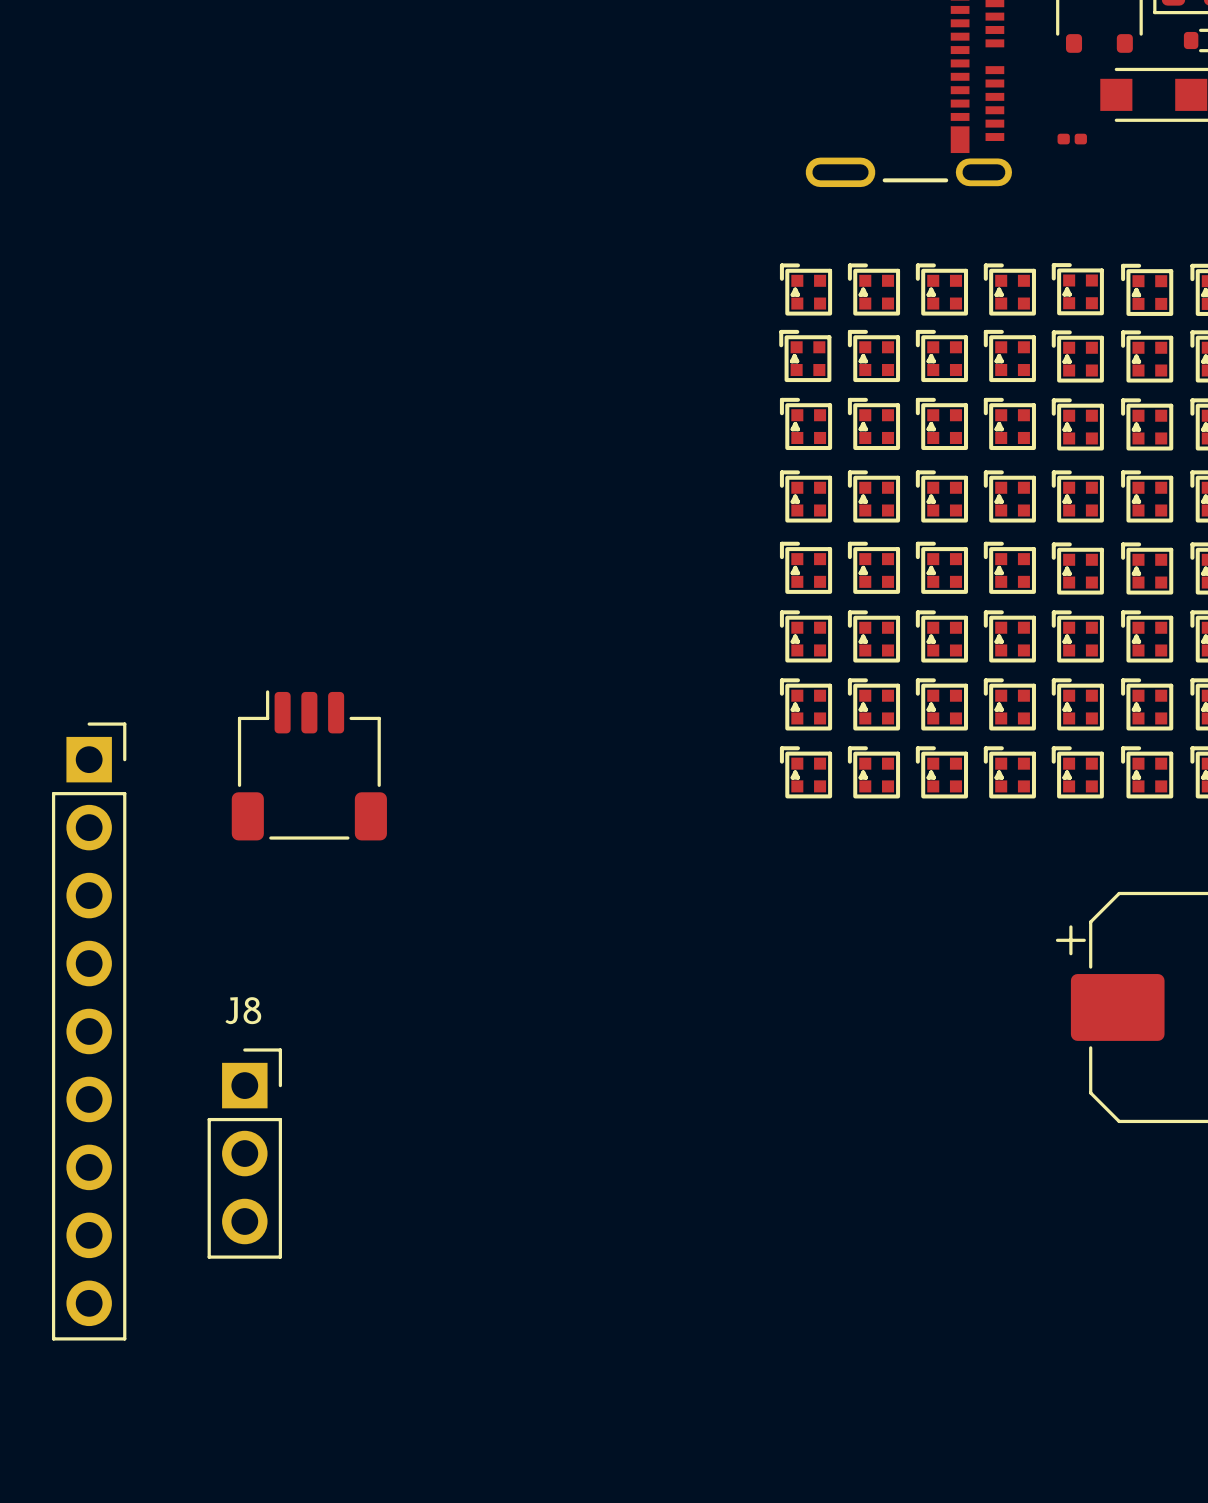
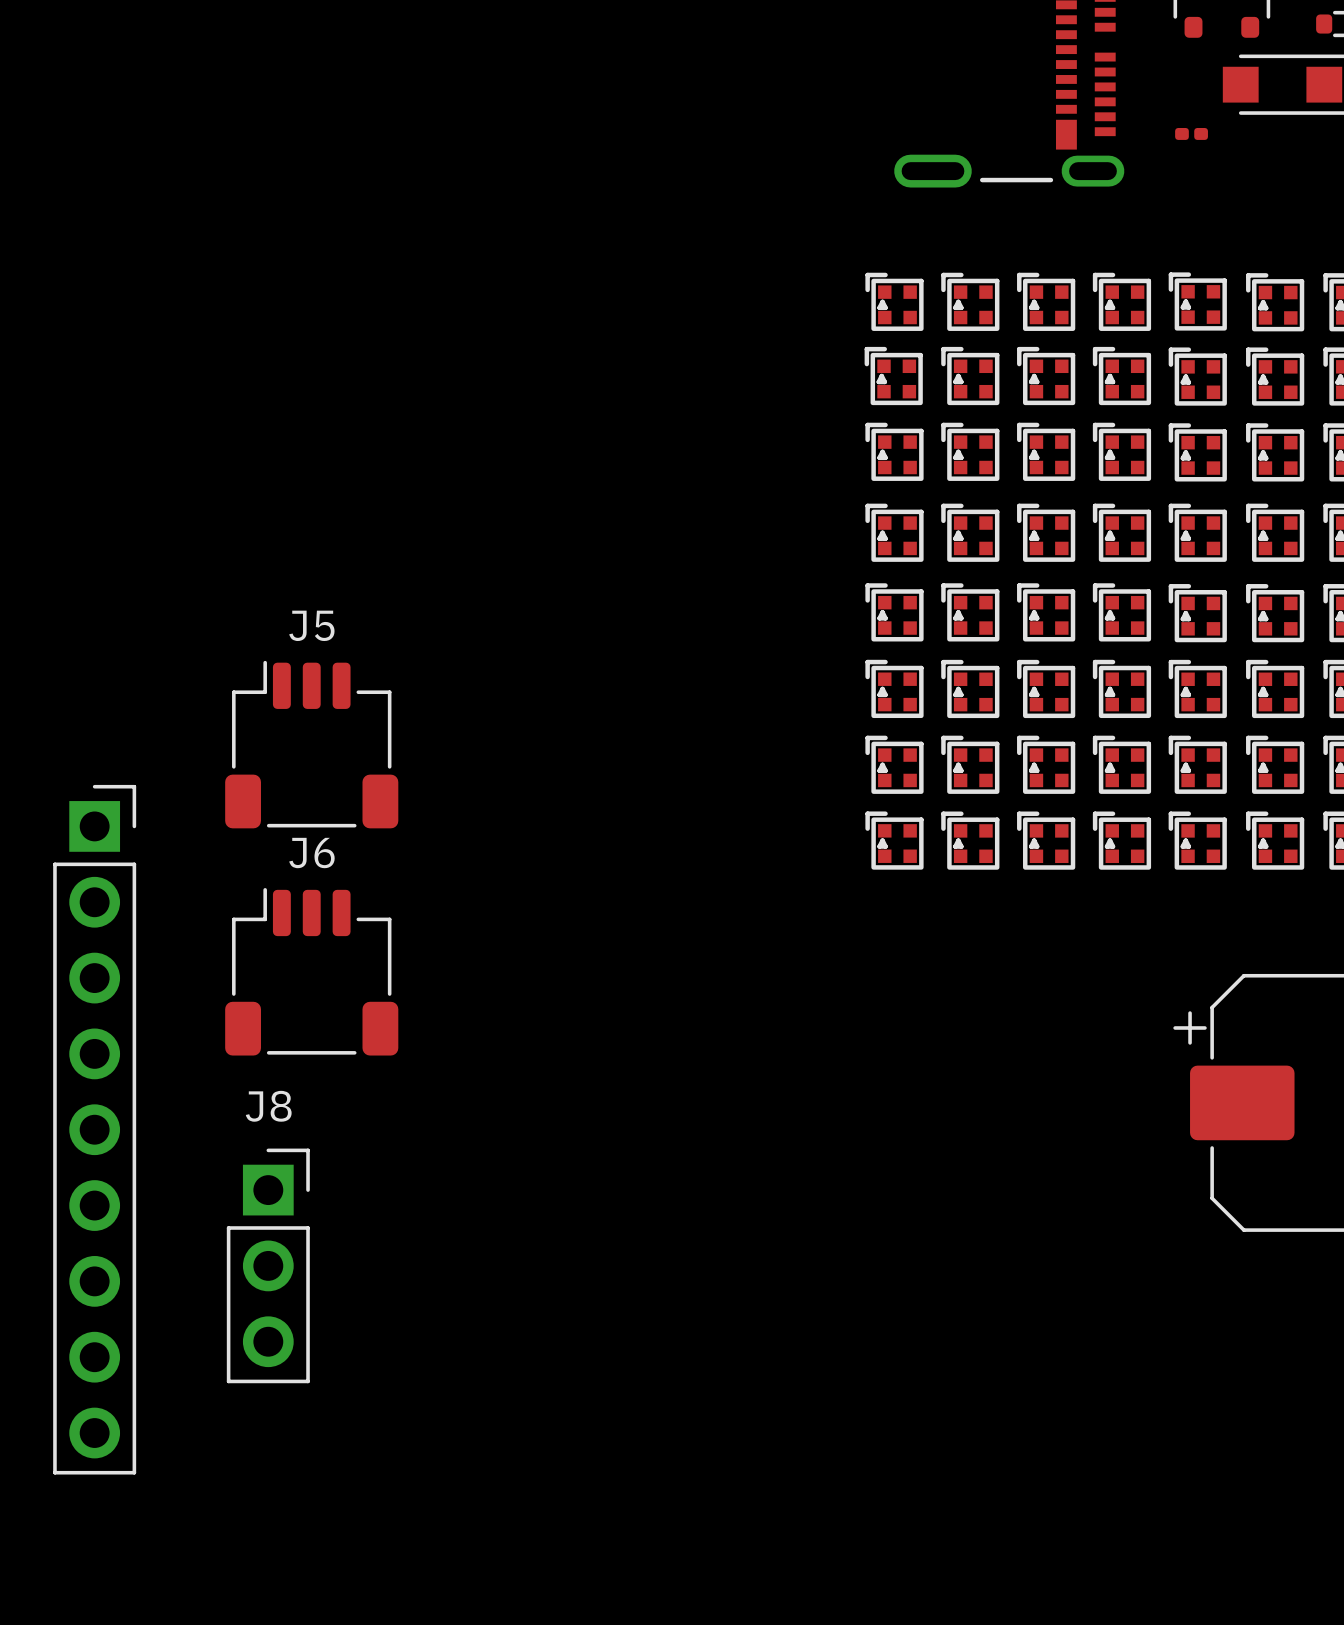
J5: none -> (311, 744)
part: (309, 765) -> none
J6: none -> (311, 971)

